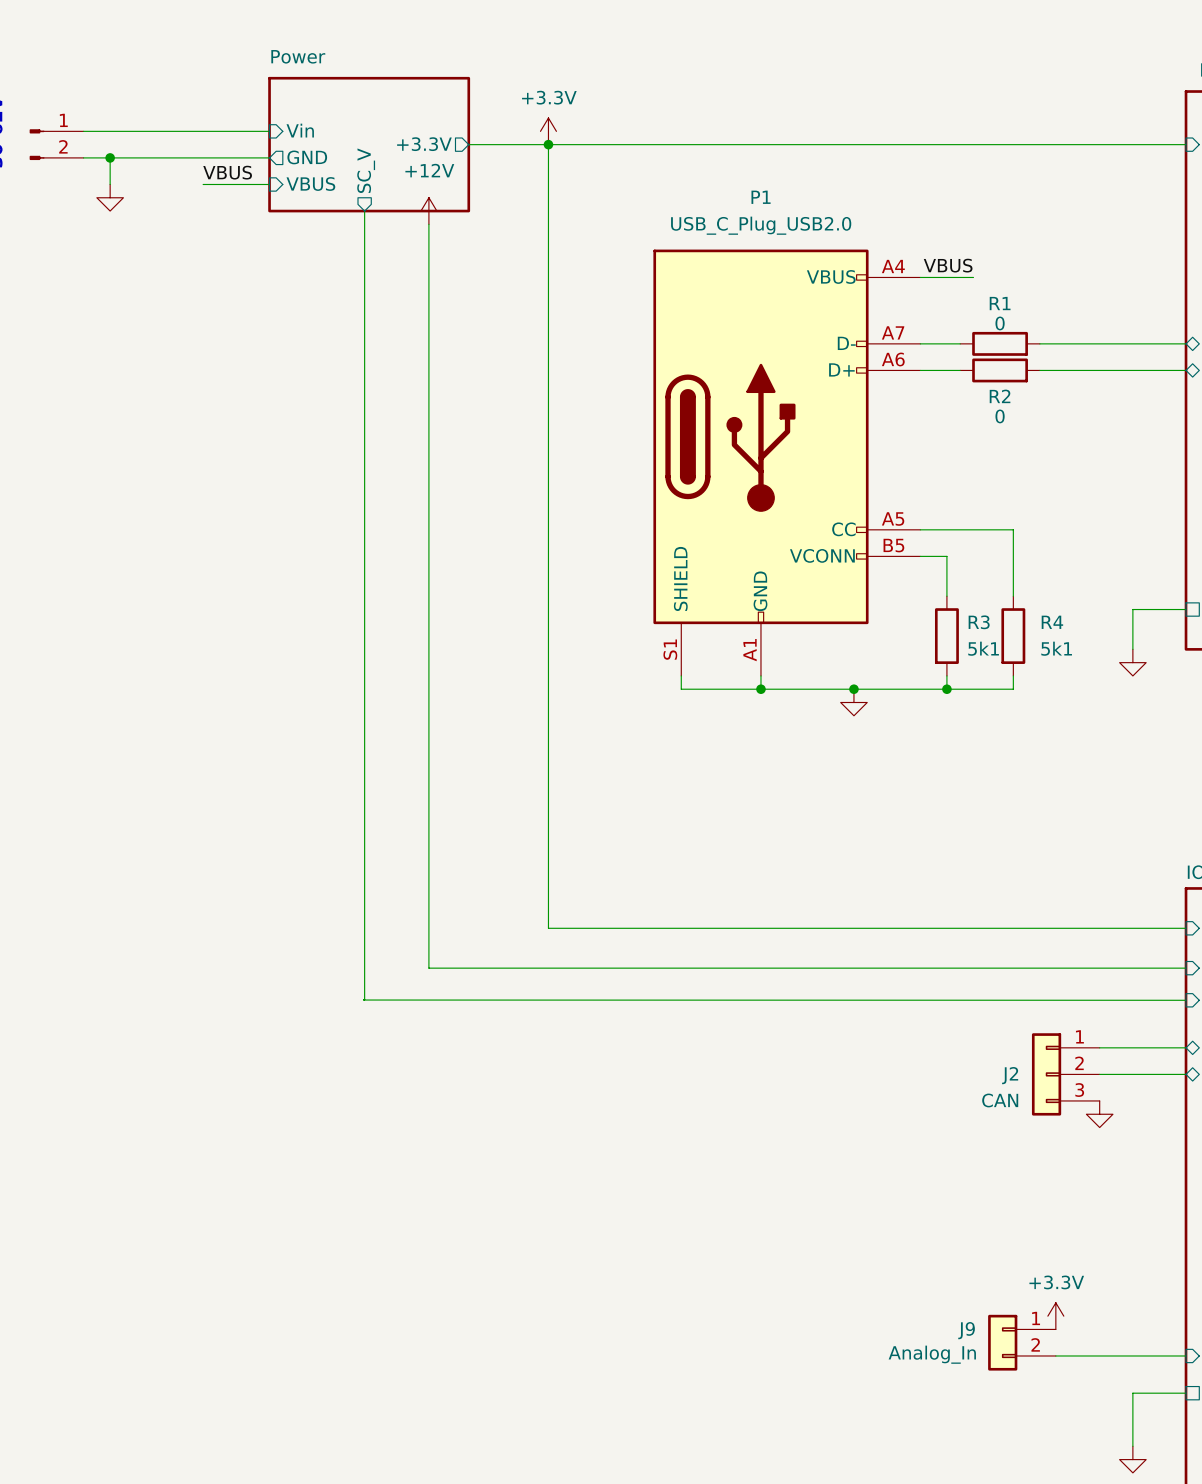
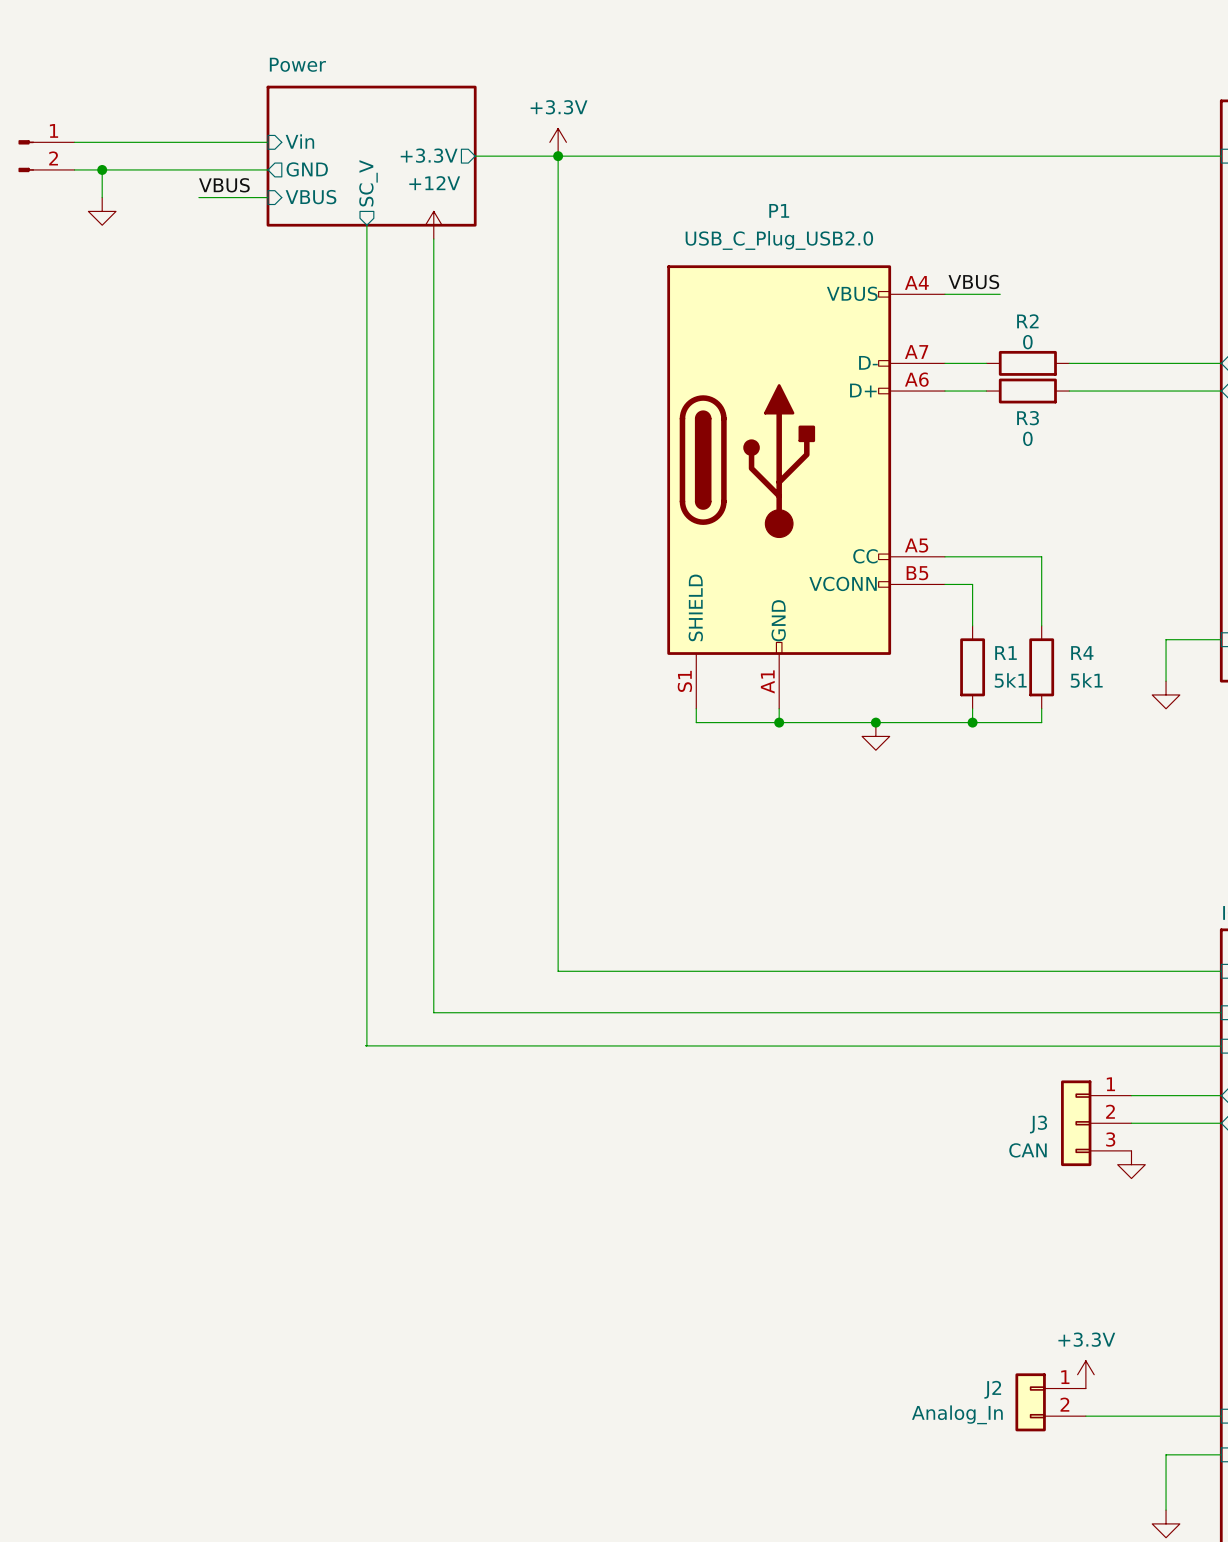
R1 name: R1 (1000, 303) -> R2 (1027, 321)
R2 name: R2 (1000, 396) -> R3 (1028, 418)
R3 name: R3 (979, 622) -> R1 (1005, 653)
J2 name: J2 (1010, 1075) -> J3 (1038, 1124)
J9 name: J9 (966, 1330) -> J2 (992, 1389)

